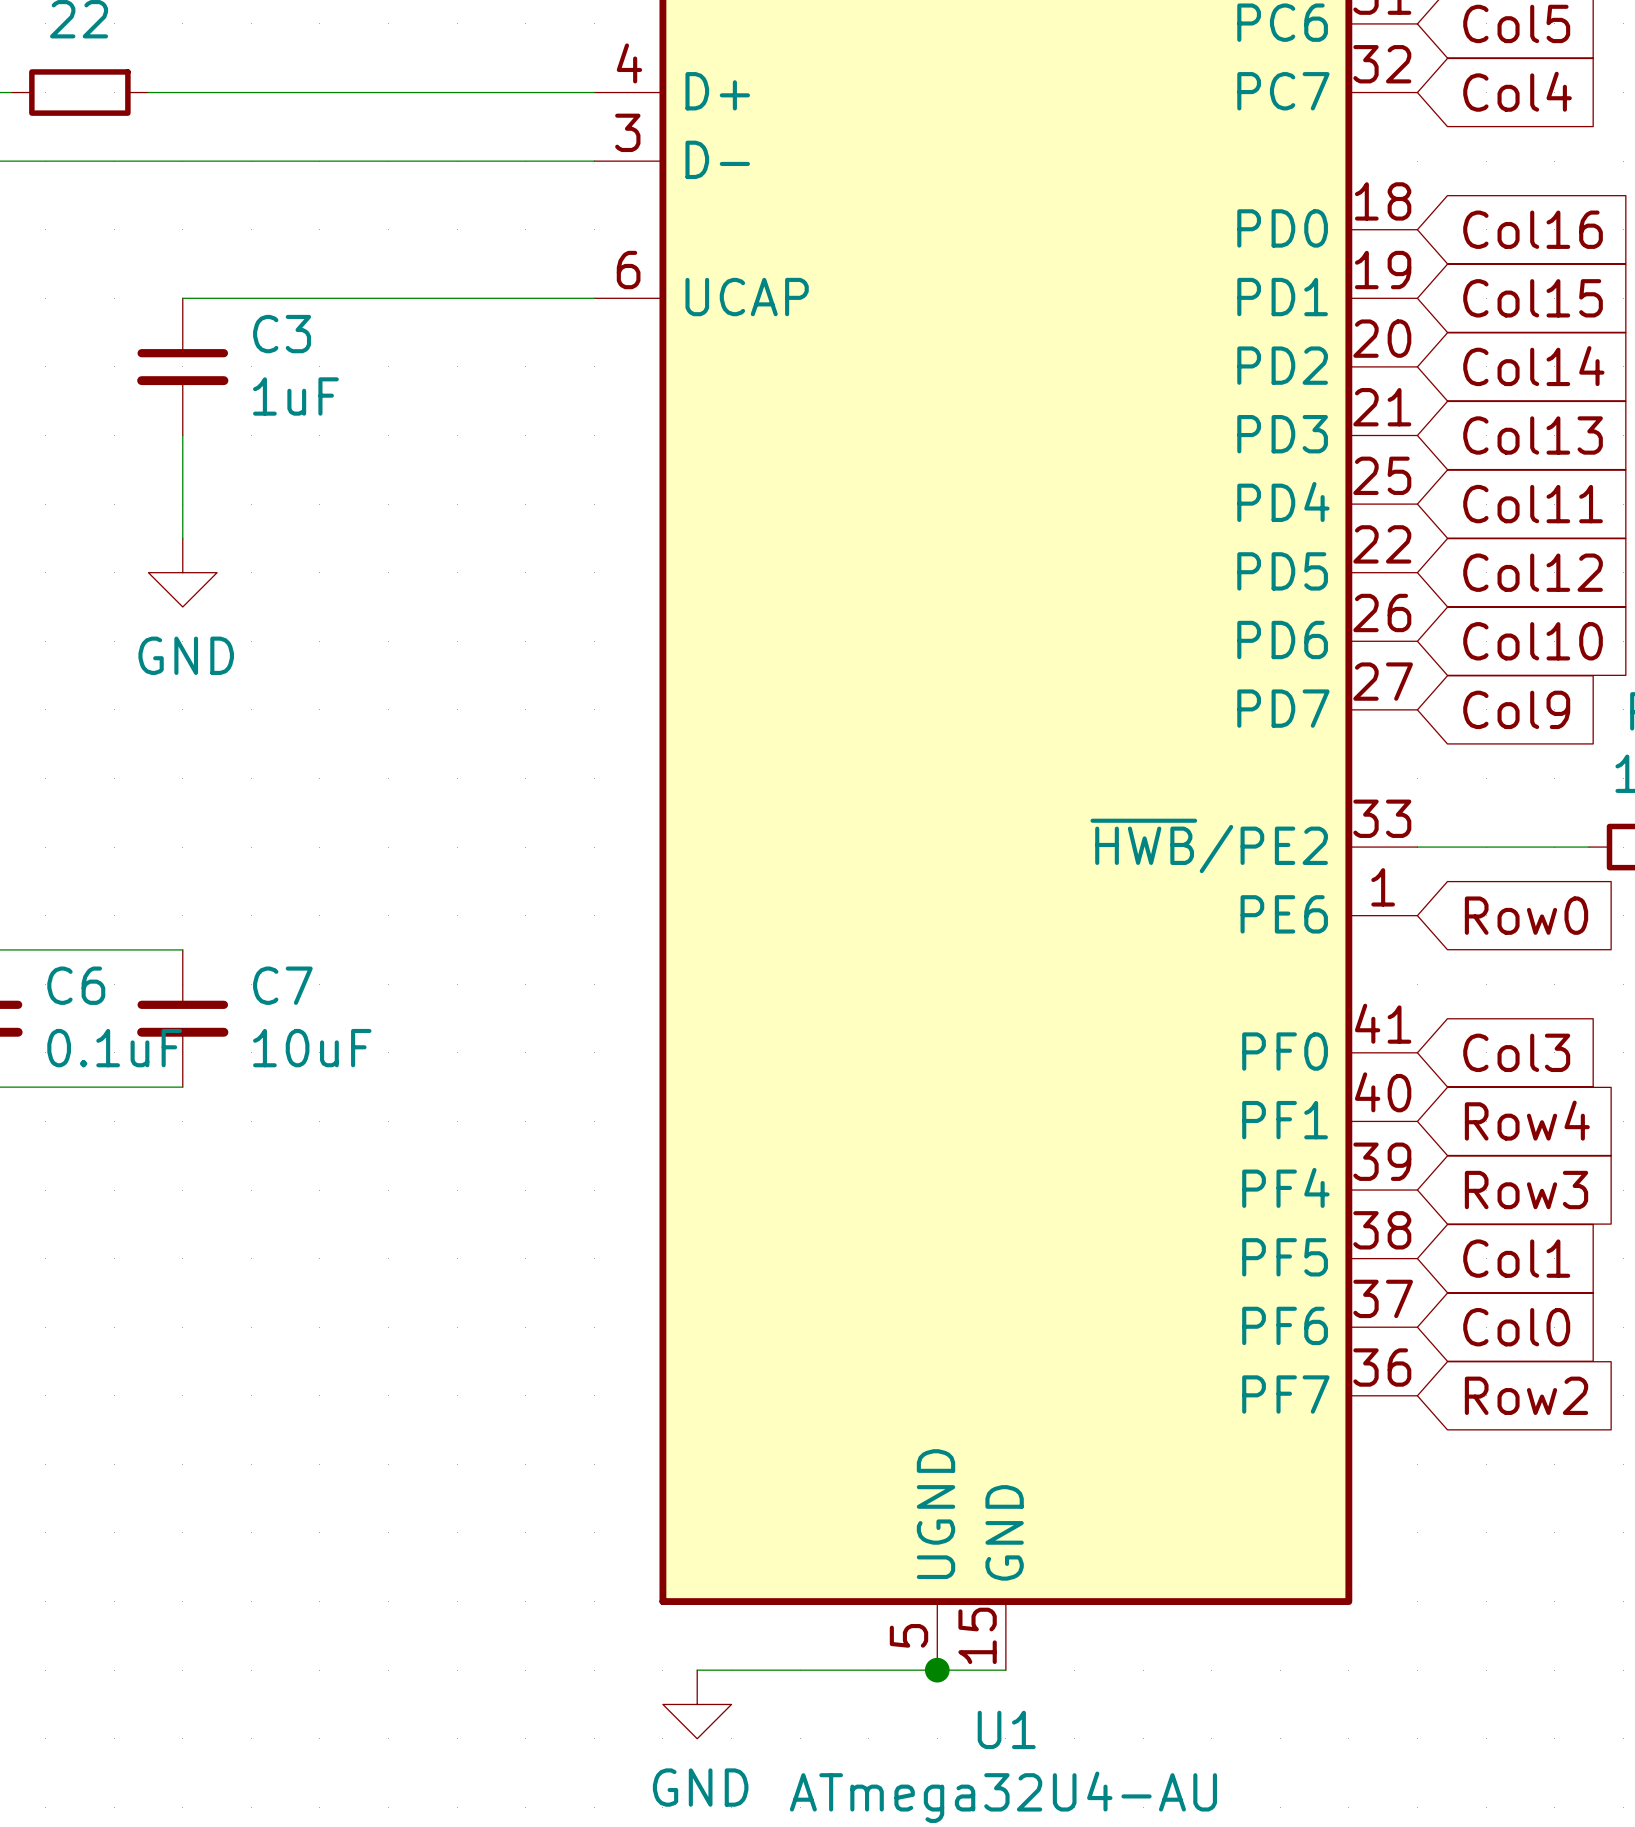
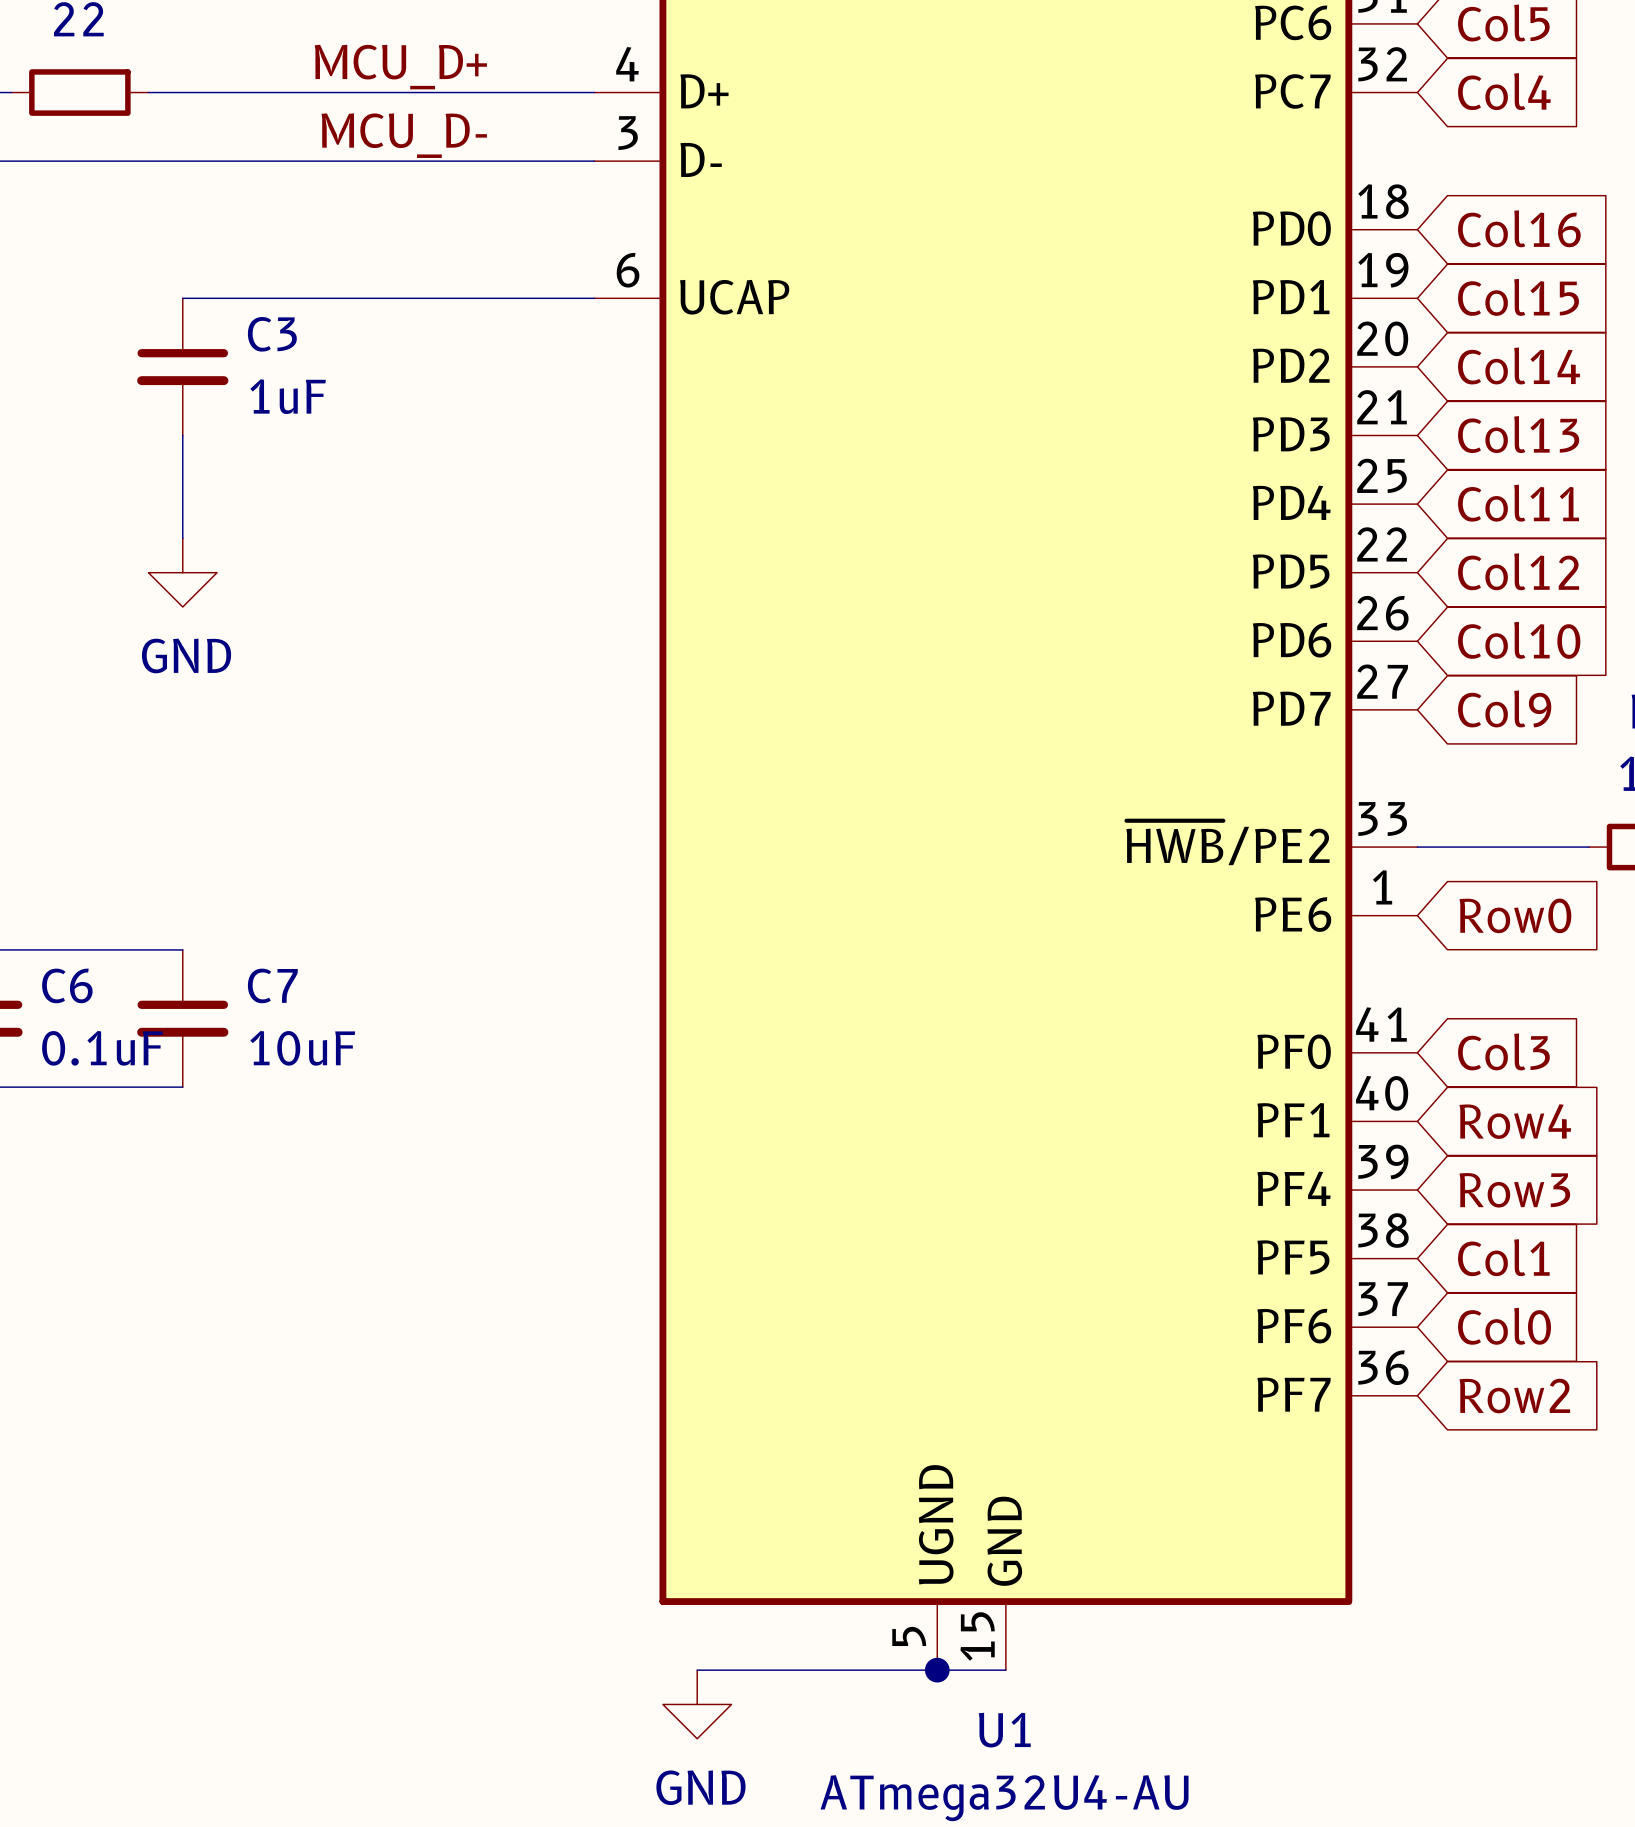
label: none -> MCU_D+ (400, 67)
label: none -> MCU_D- (404, 135)

